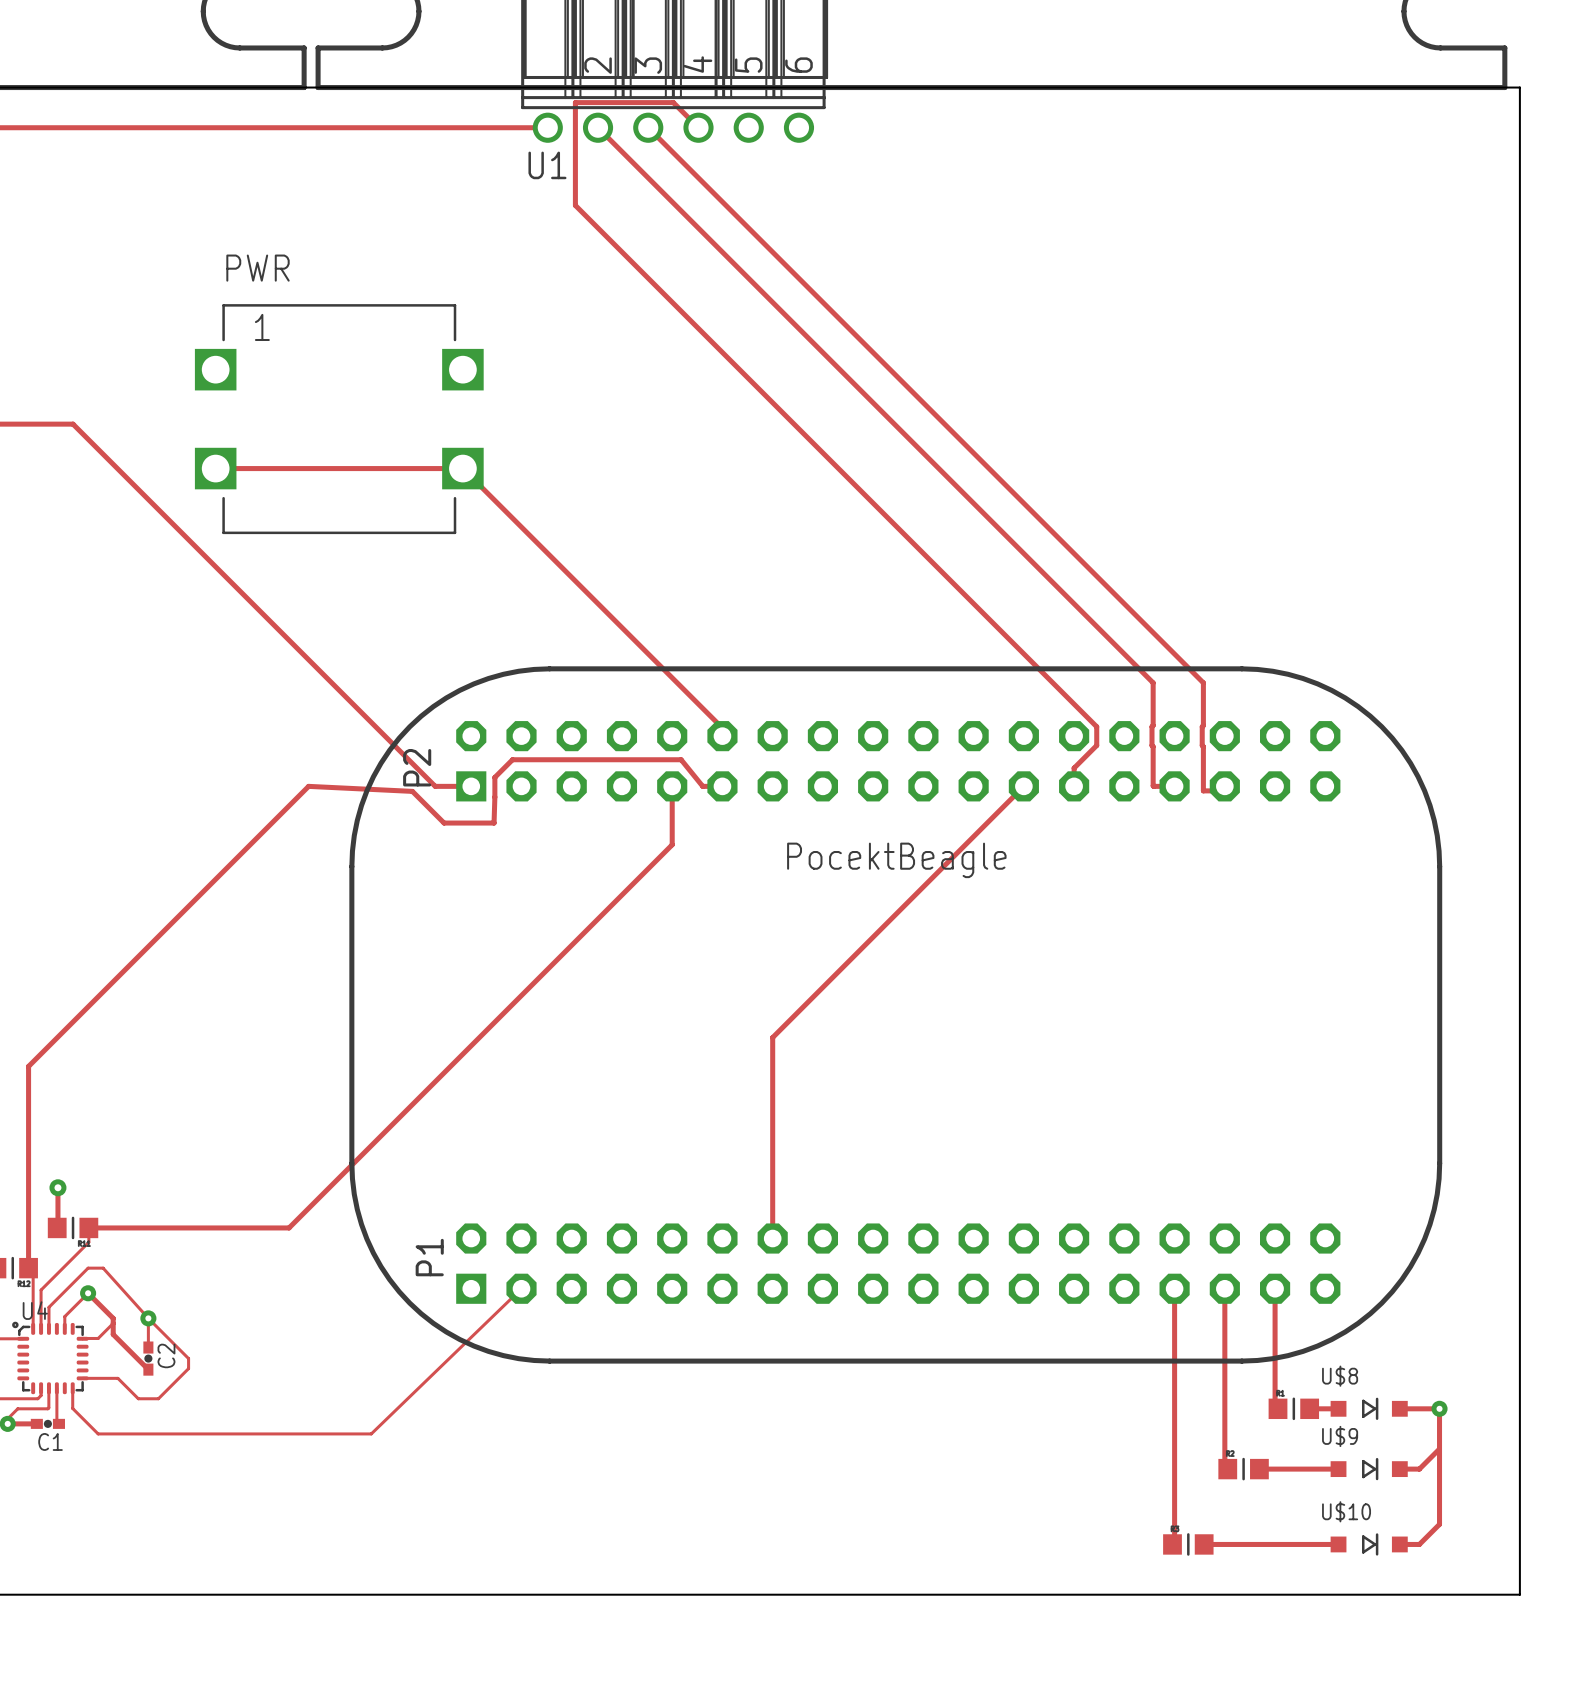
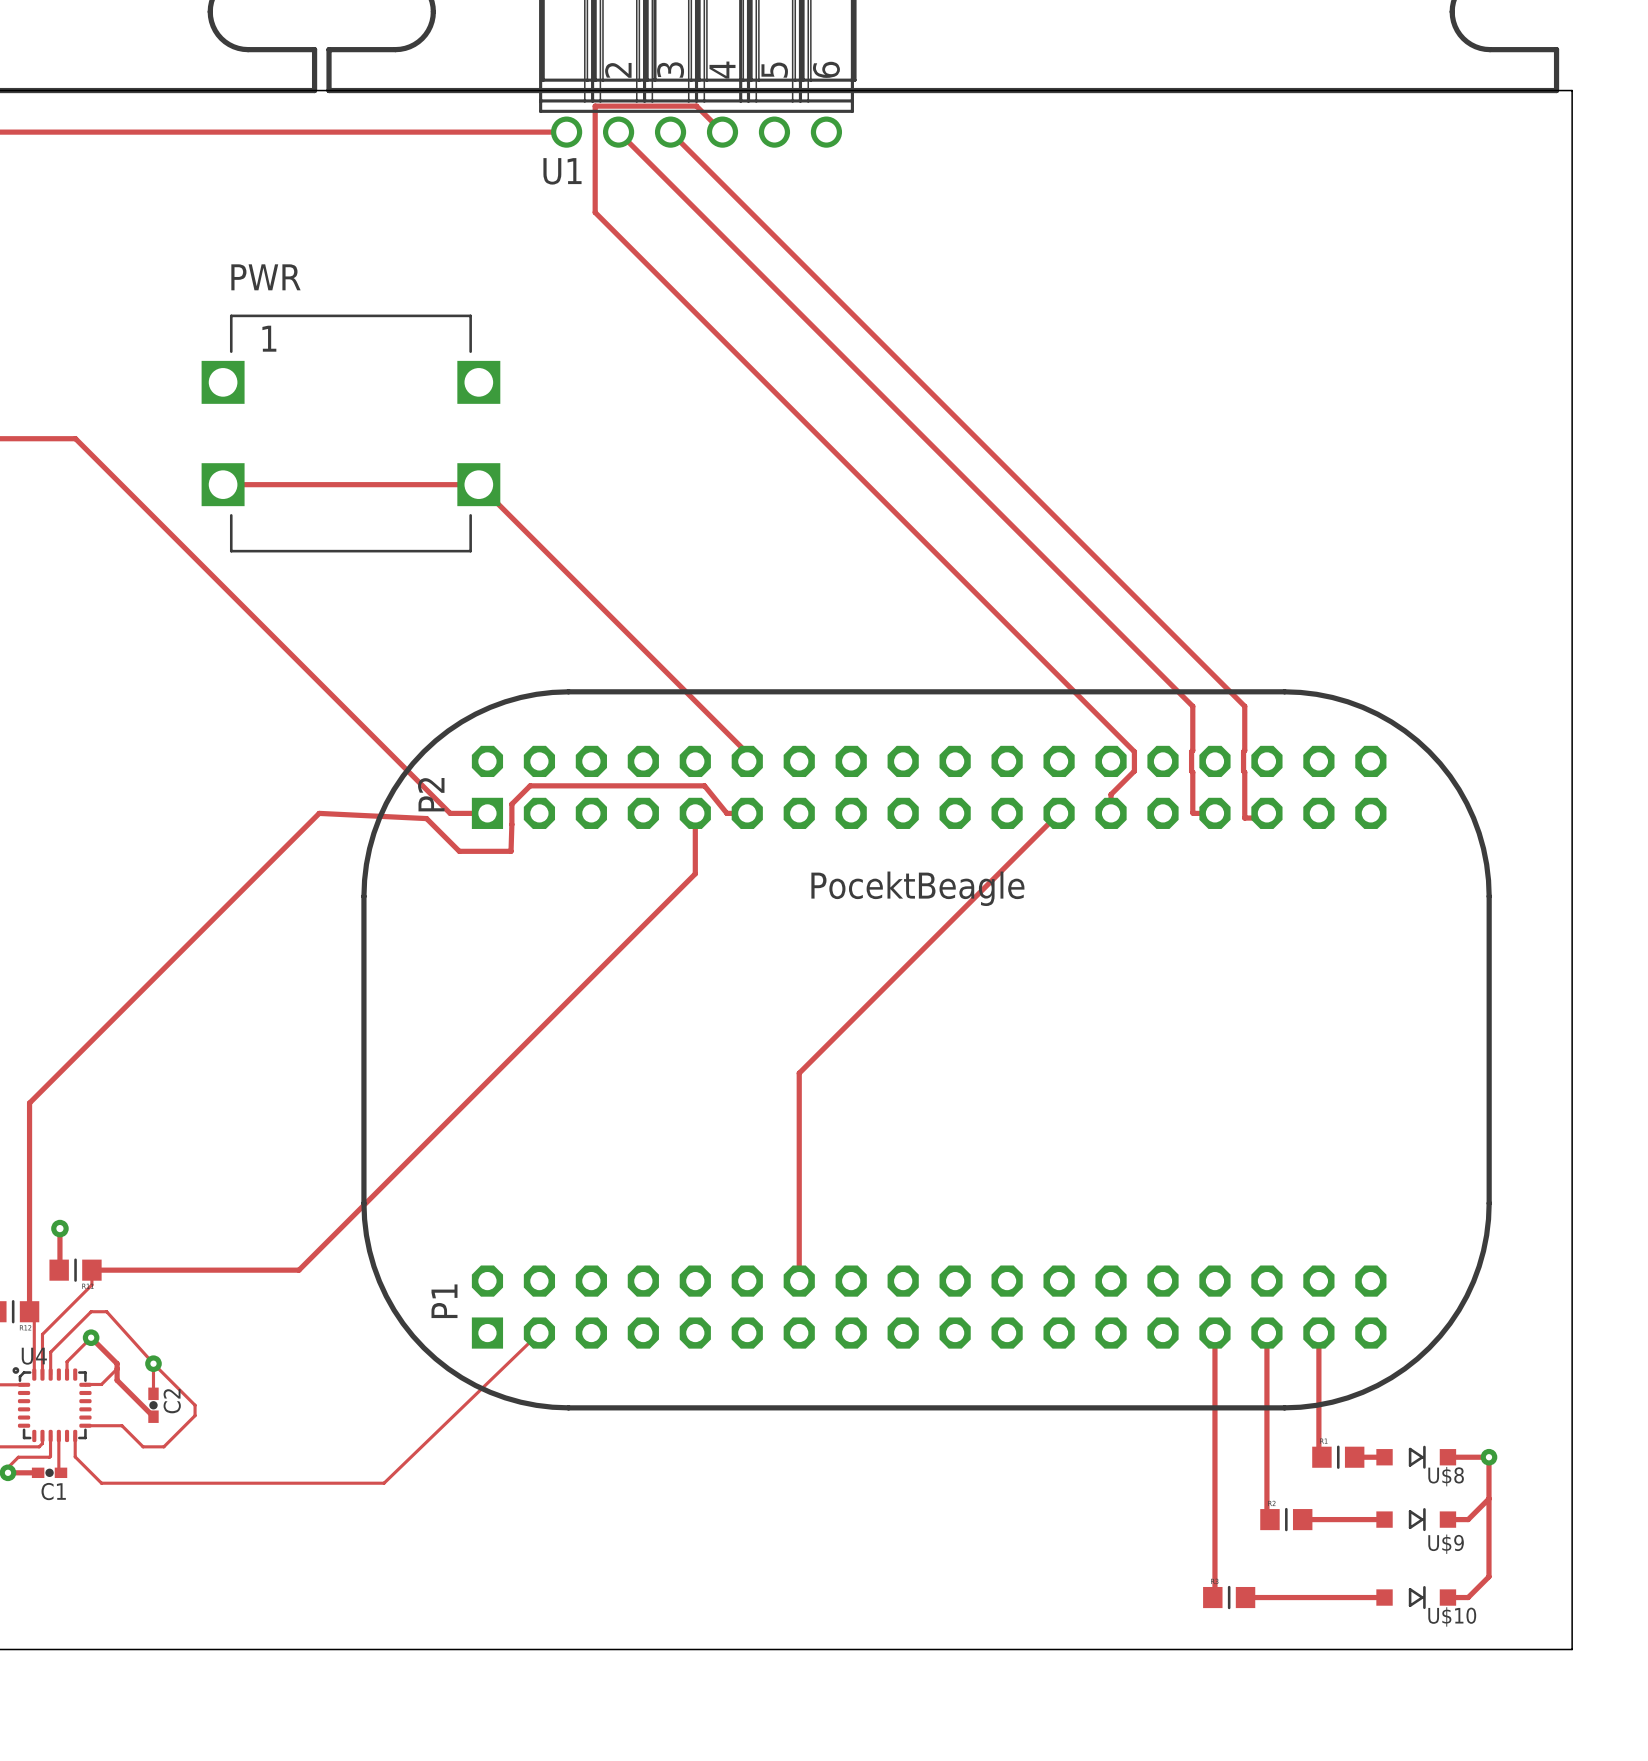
U$8 name position: U$8 (1340, 1376) -> U$8 (1446, 1476)
U$9 name position: U$9 (1340, 1436) -> U$9 (1446, 1544)
U$10 name position: U$10 (1346, 1511) -> U$10 (1452, 1616)

